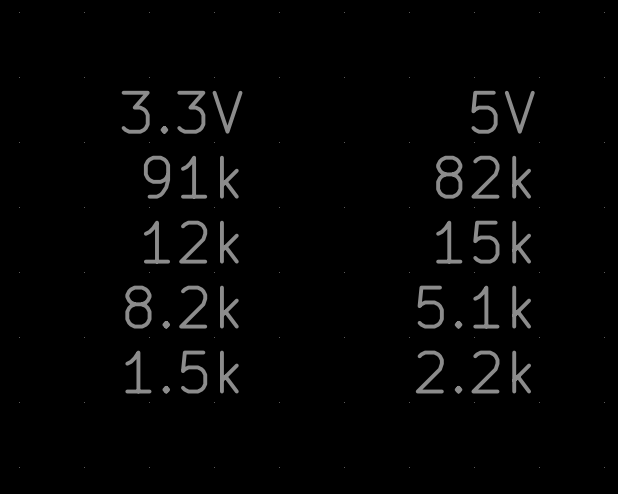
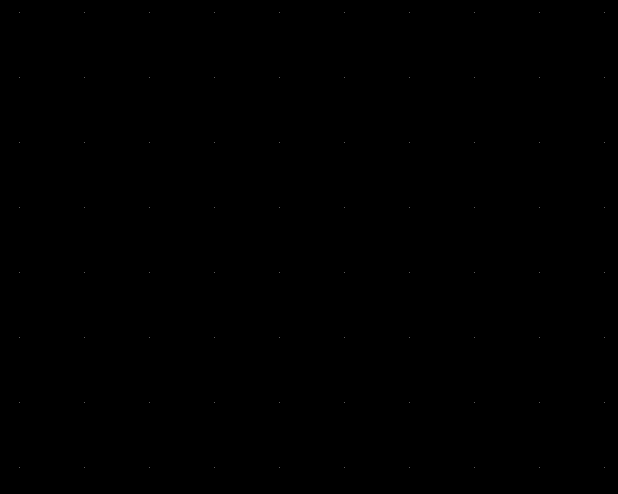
text: 3.3V (182, 112) -> none
text: 5V (503, 112) -> none
text: 91k (191, 177) -> none
text: 82k (483, 177) -> none
text: 12k (191, 242) -> none
text: 15k (483, 242) -> none
text: 8.2k (182, 307) -> none
text: 5.1k (474, 307) -> none
text: 1.5k (182, 372) -> none
text: 2.2k (473, 372) -> none

